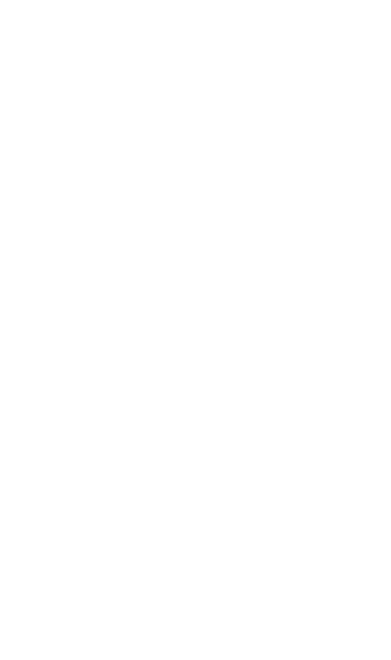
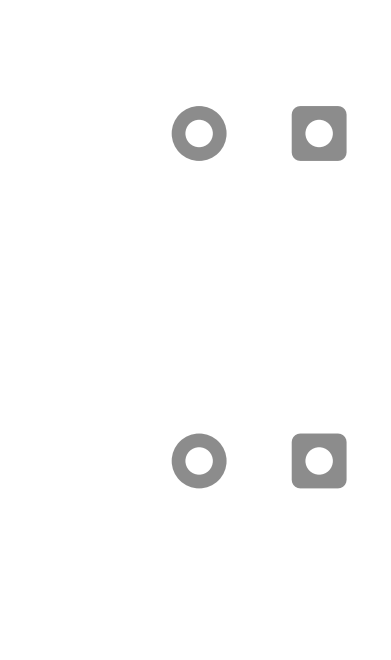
part: none -> (259, 133)
part: none -> (259, 460)

